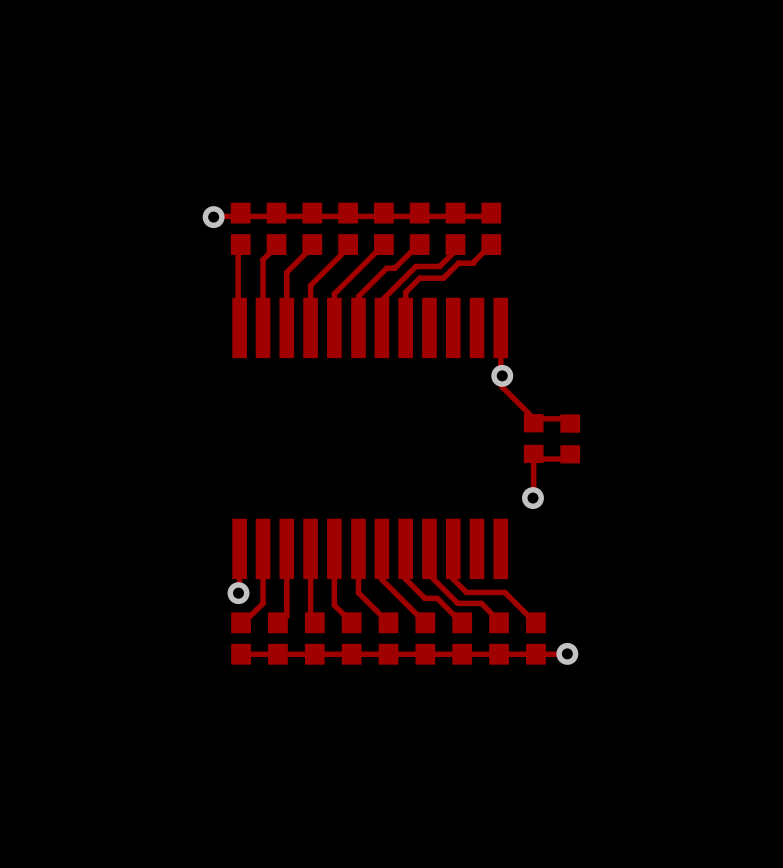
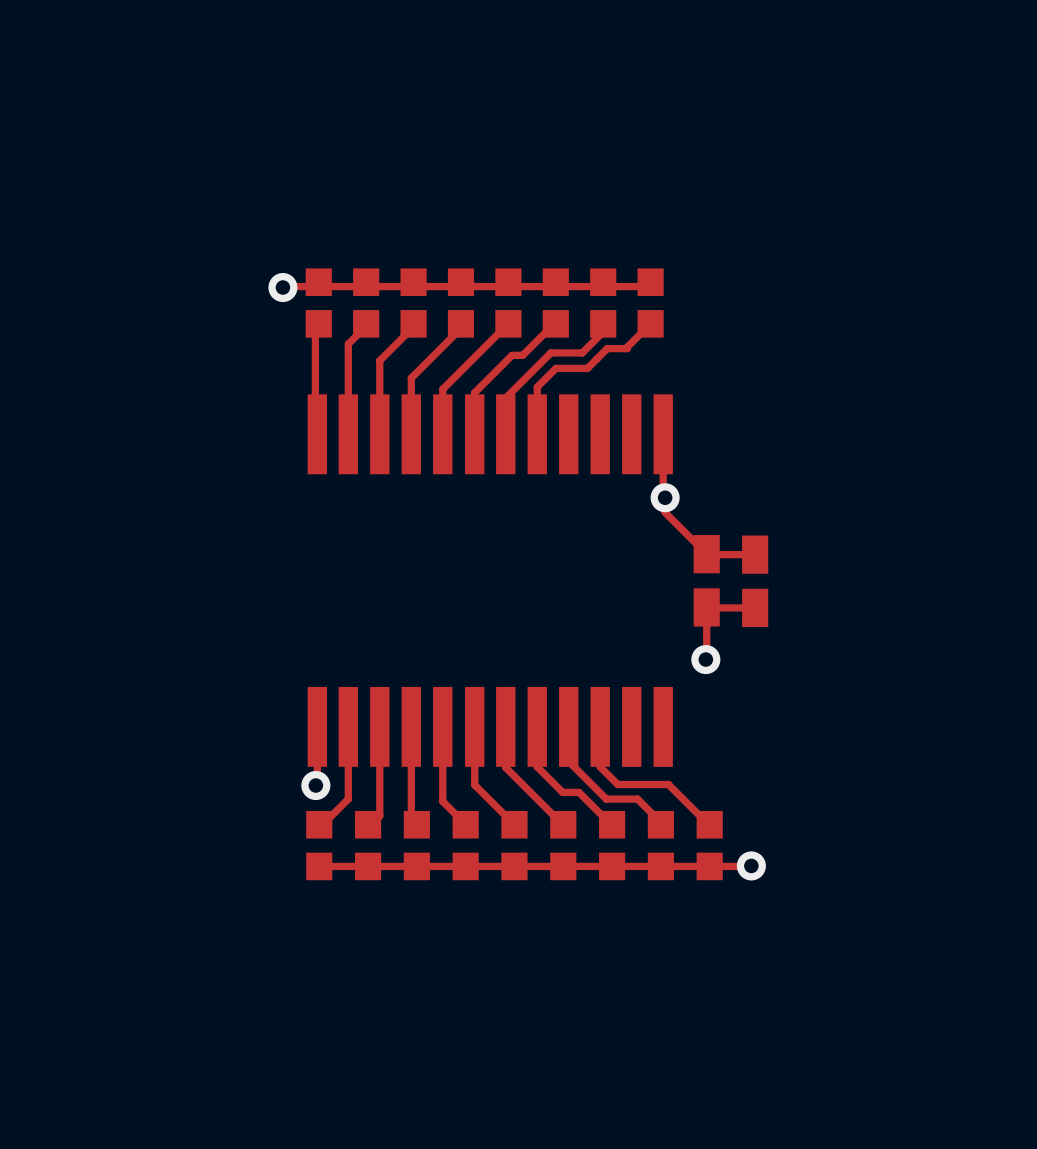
part footprint: [523, 414, 544, 464] -> [693, 535, 720, 627]
part footprint: [560, 414, 581, 464] -> [742, 535, 769, 628]

